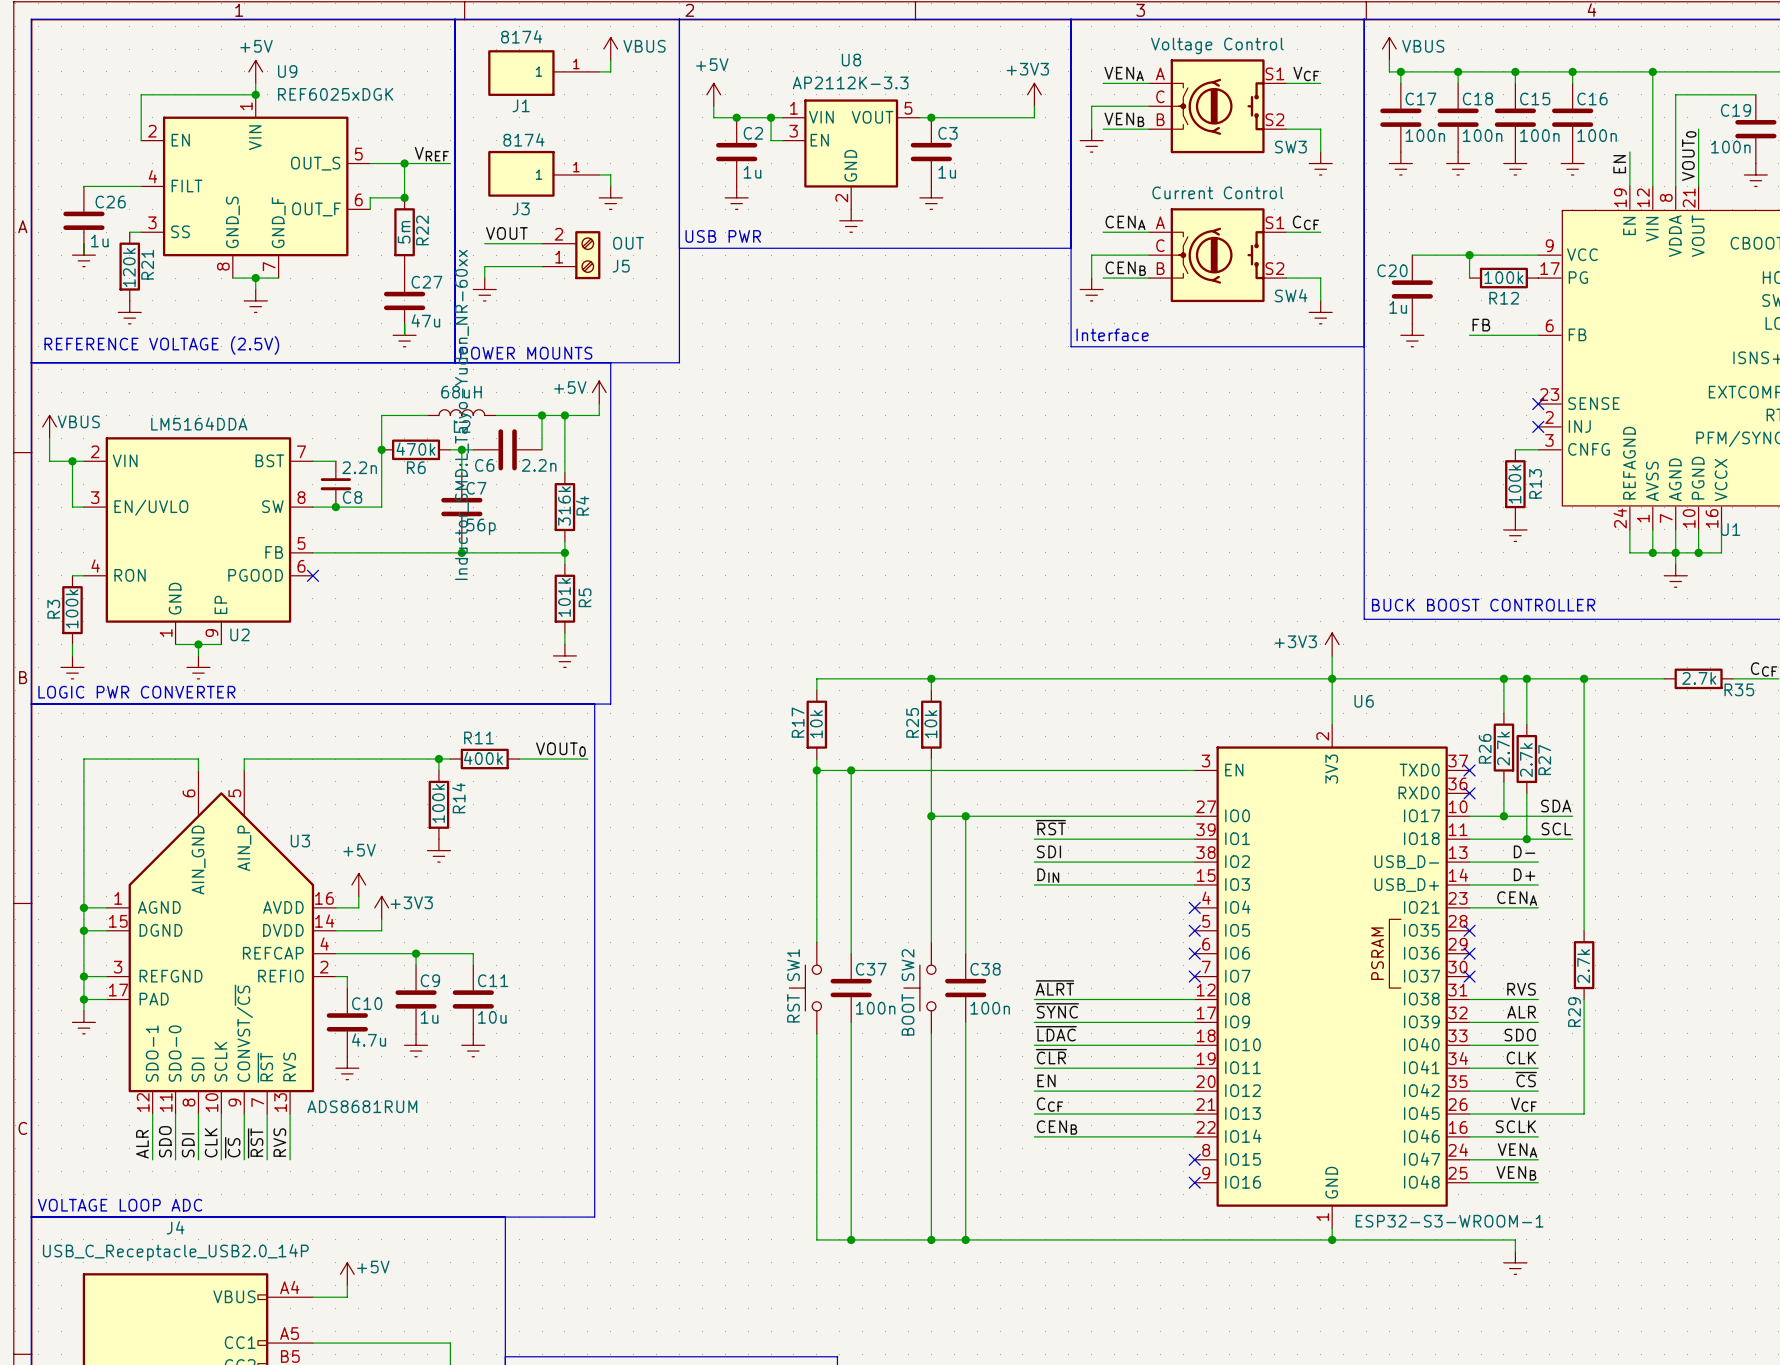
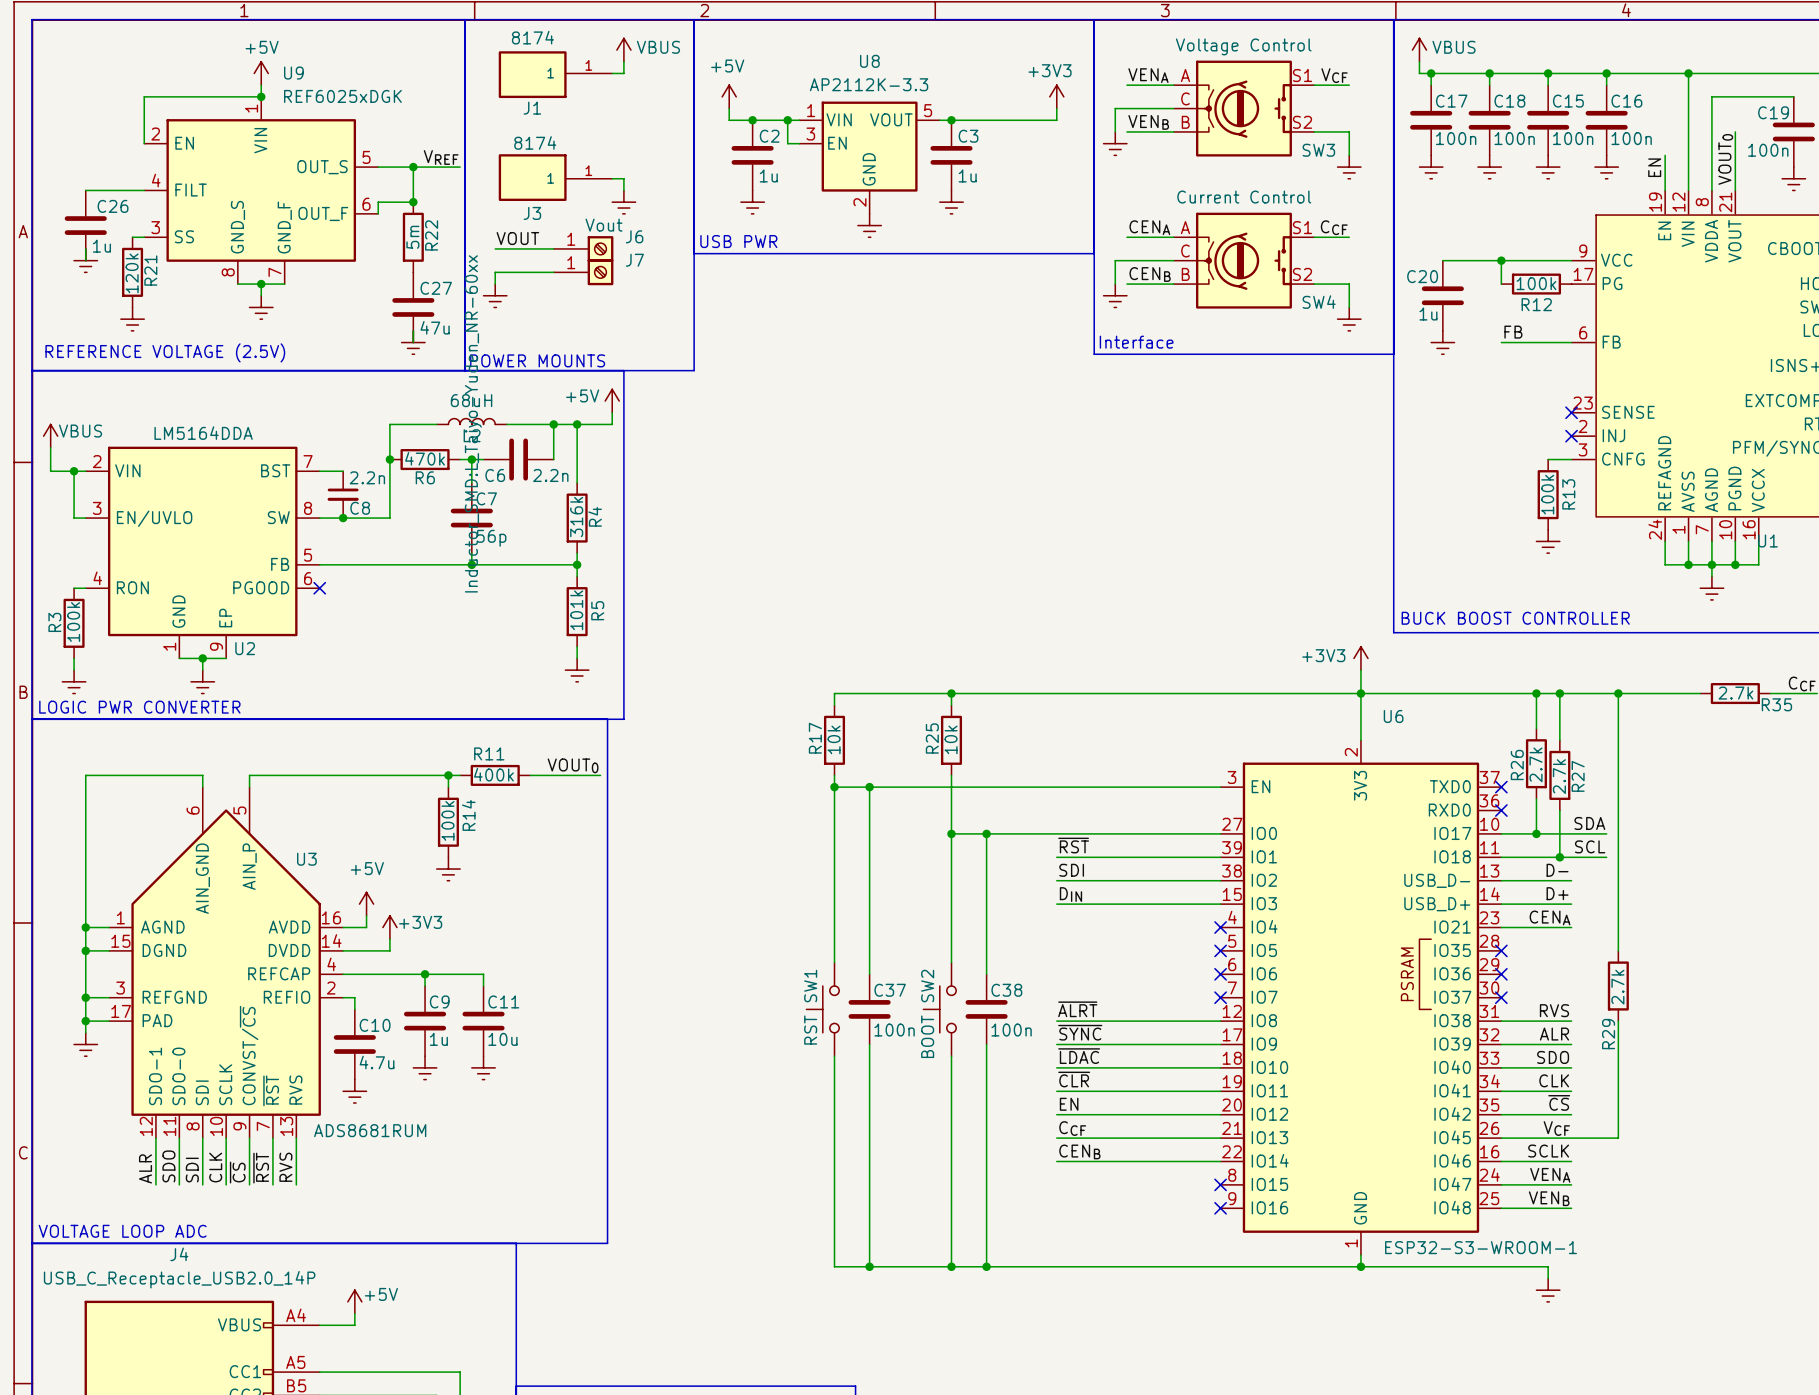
J6: none -> Vout (583, 248)
J5: OUT (571, 255) -> none
J7: none -> (583, 272)

